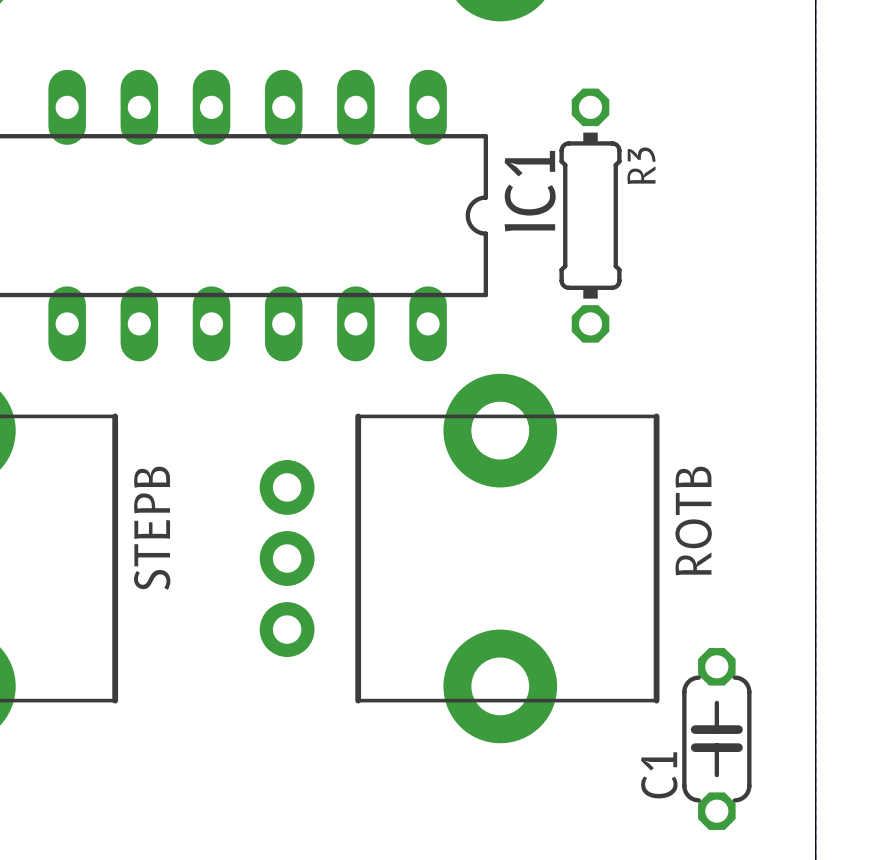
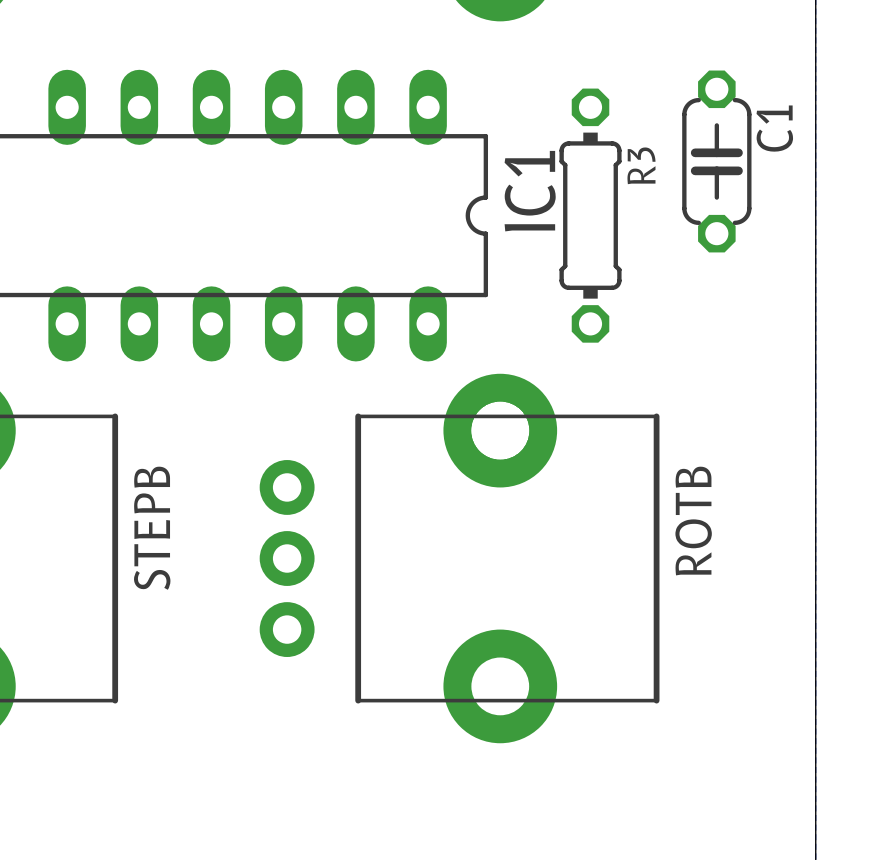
C1 rotation: 0° (716, 738) -> 180° (716, 161)
C1 position: (716, 738) -> (716, 161)

